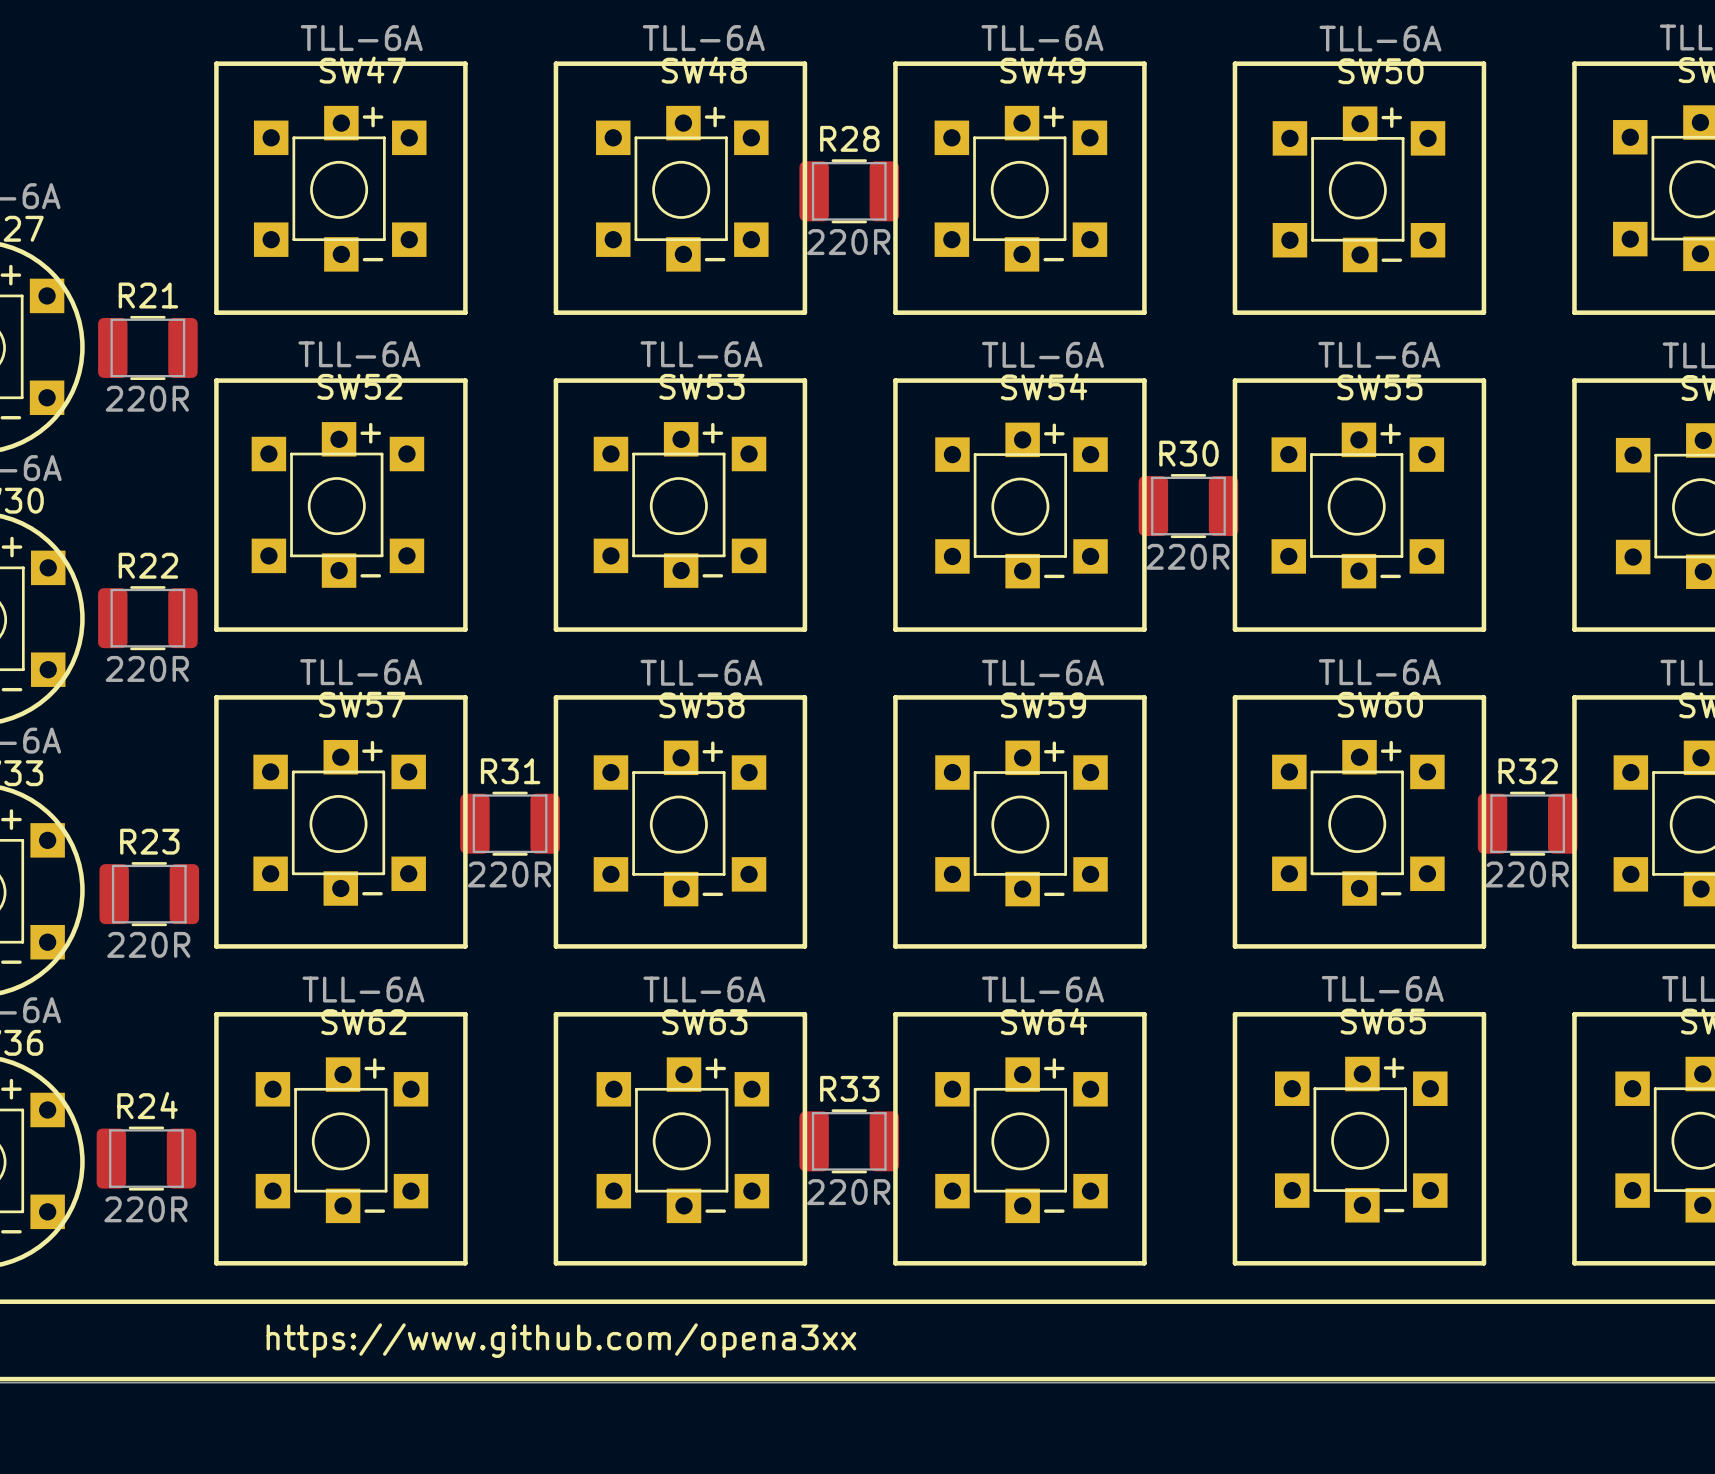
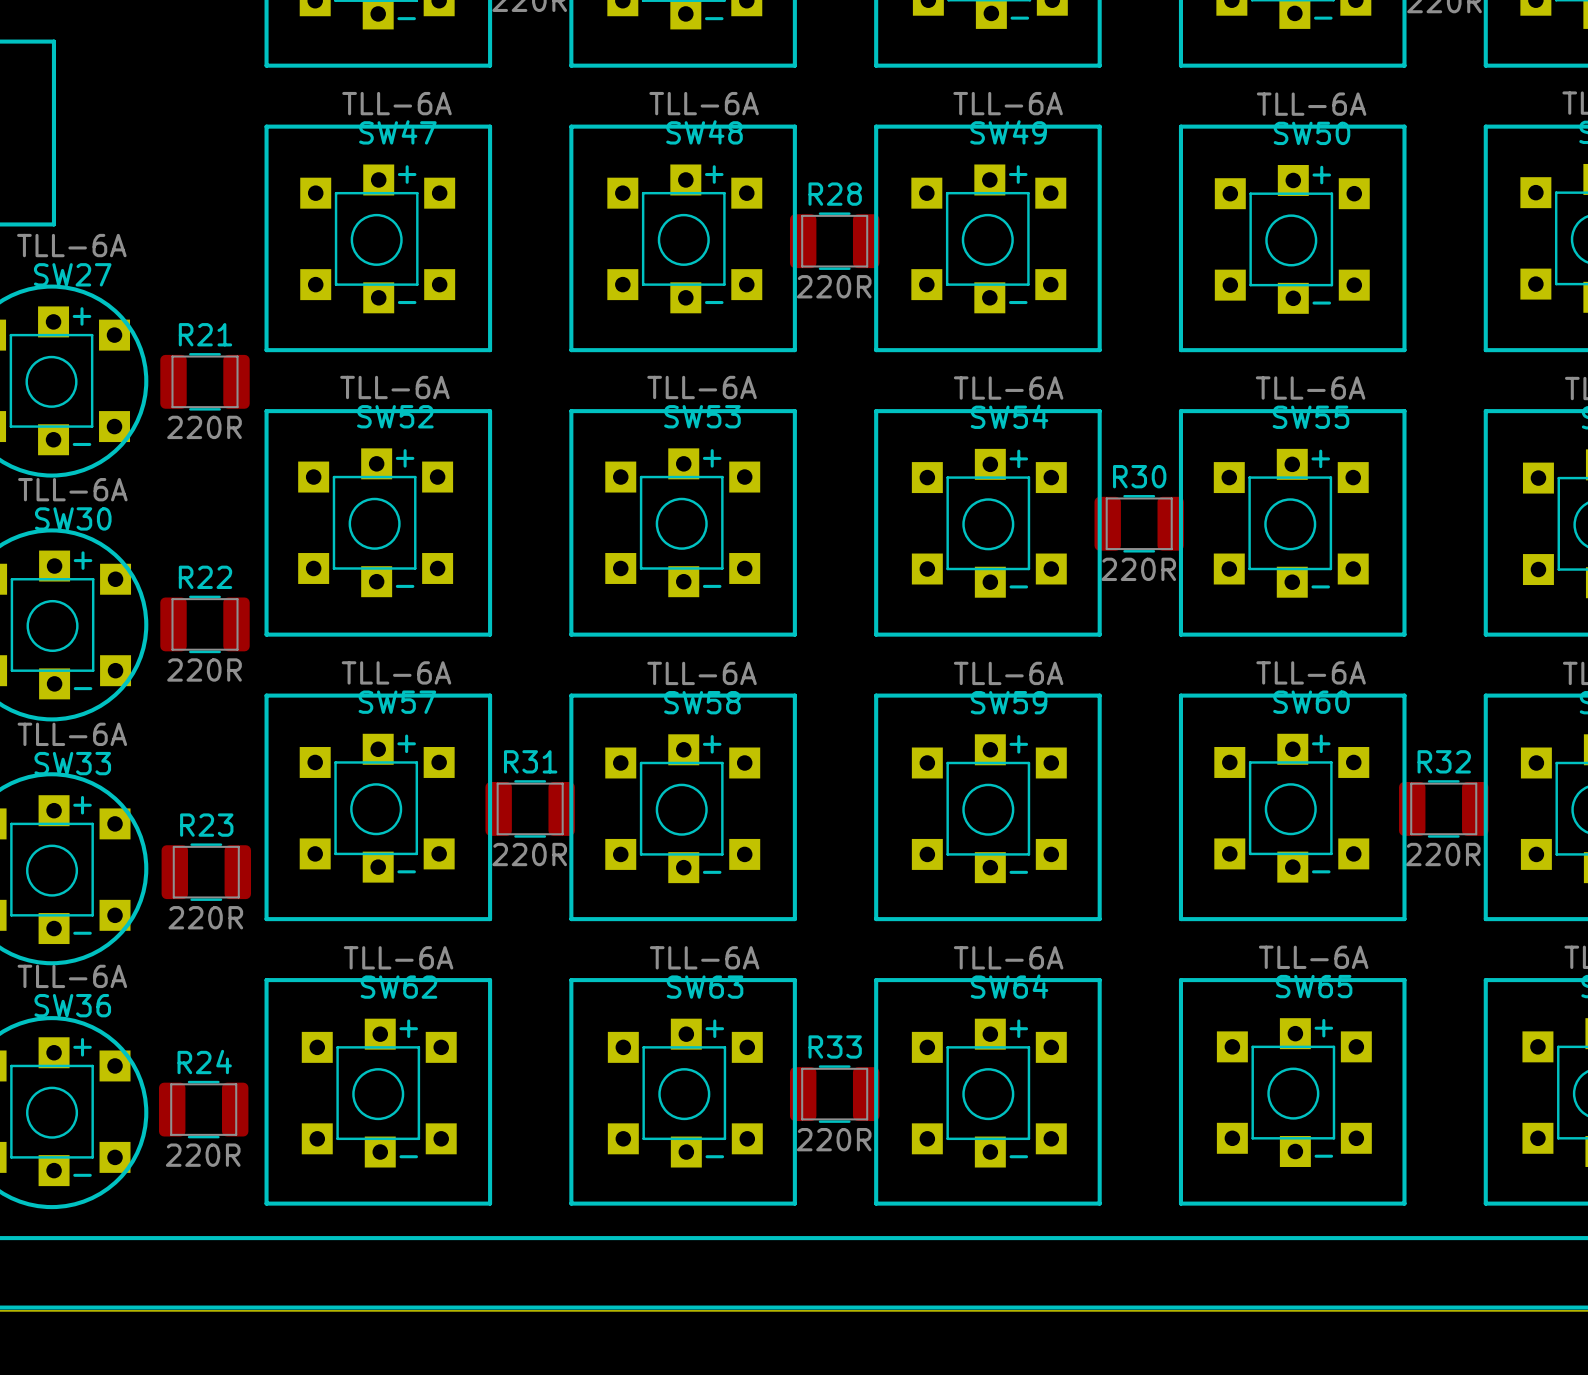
text: https://www.github.com/opena3xx (561, 1340) -> none

